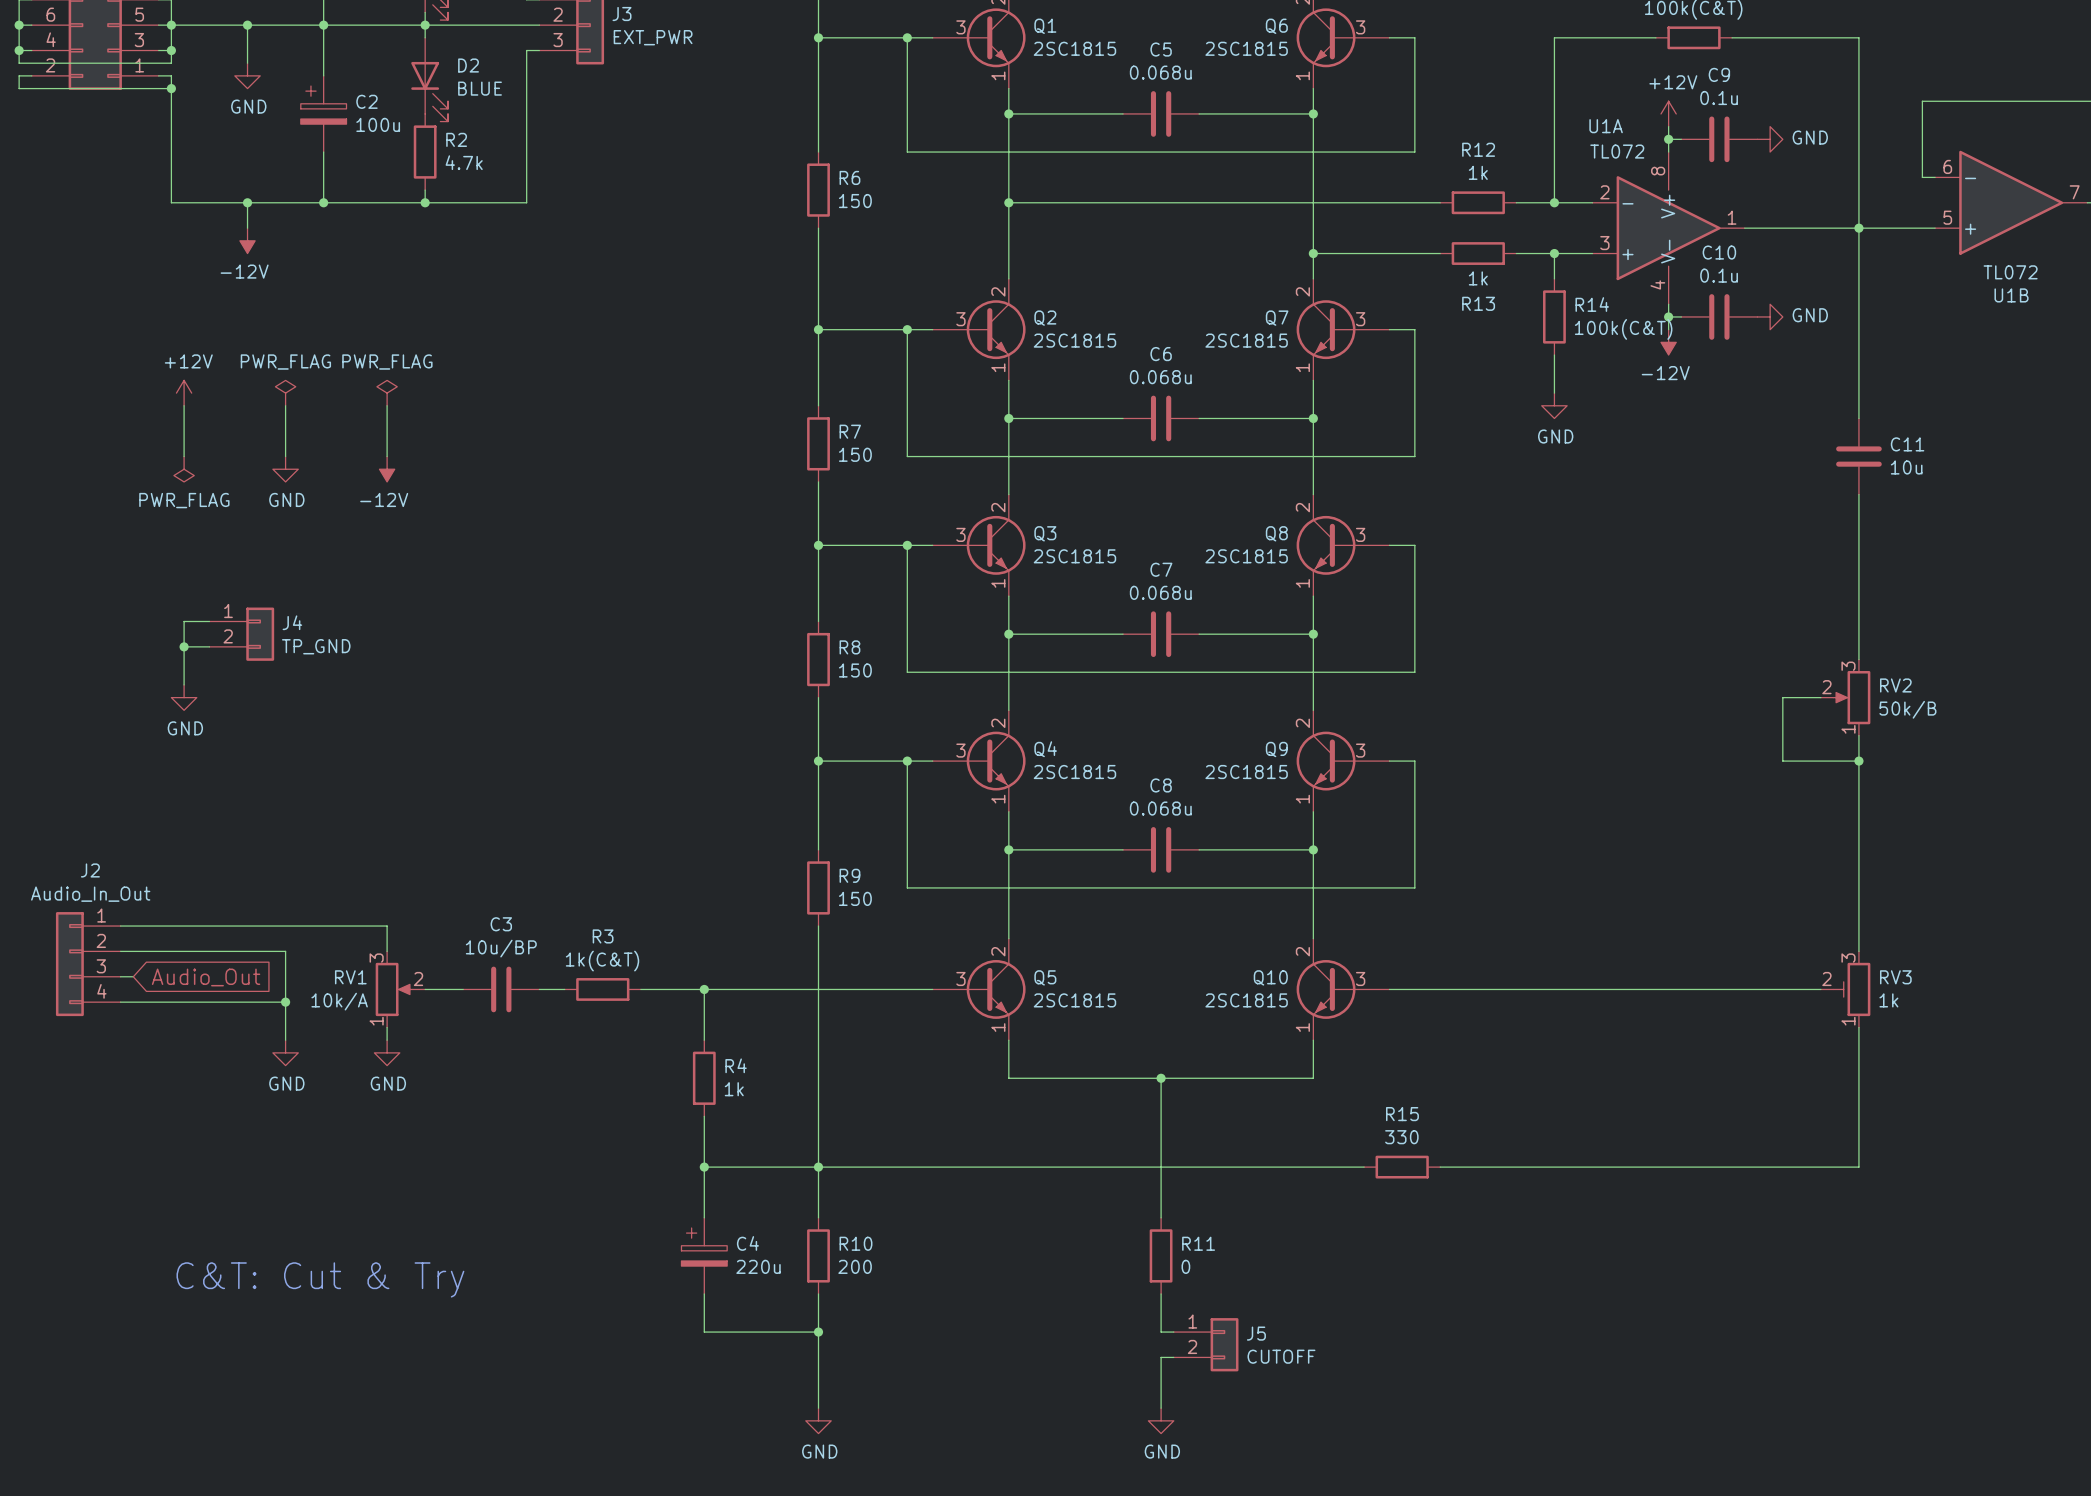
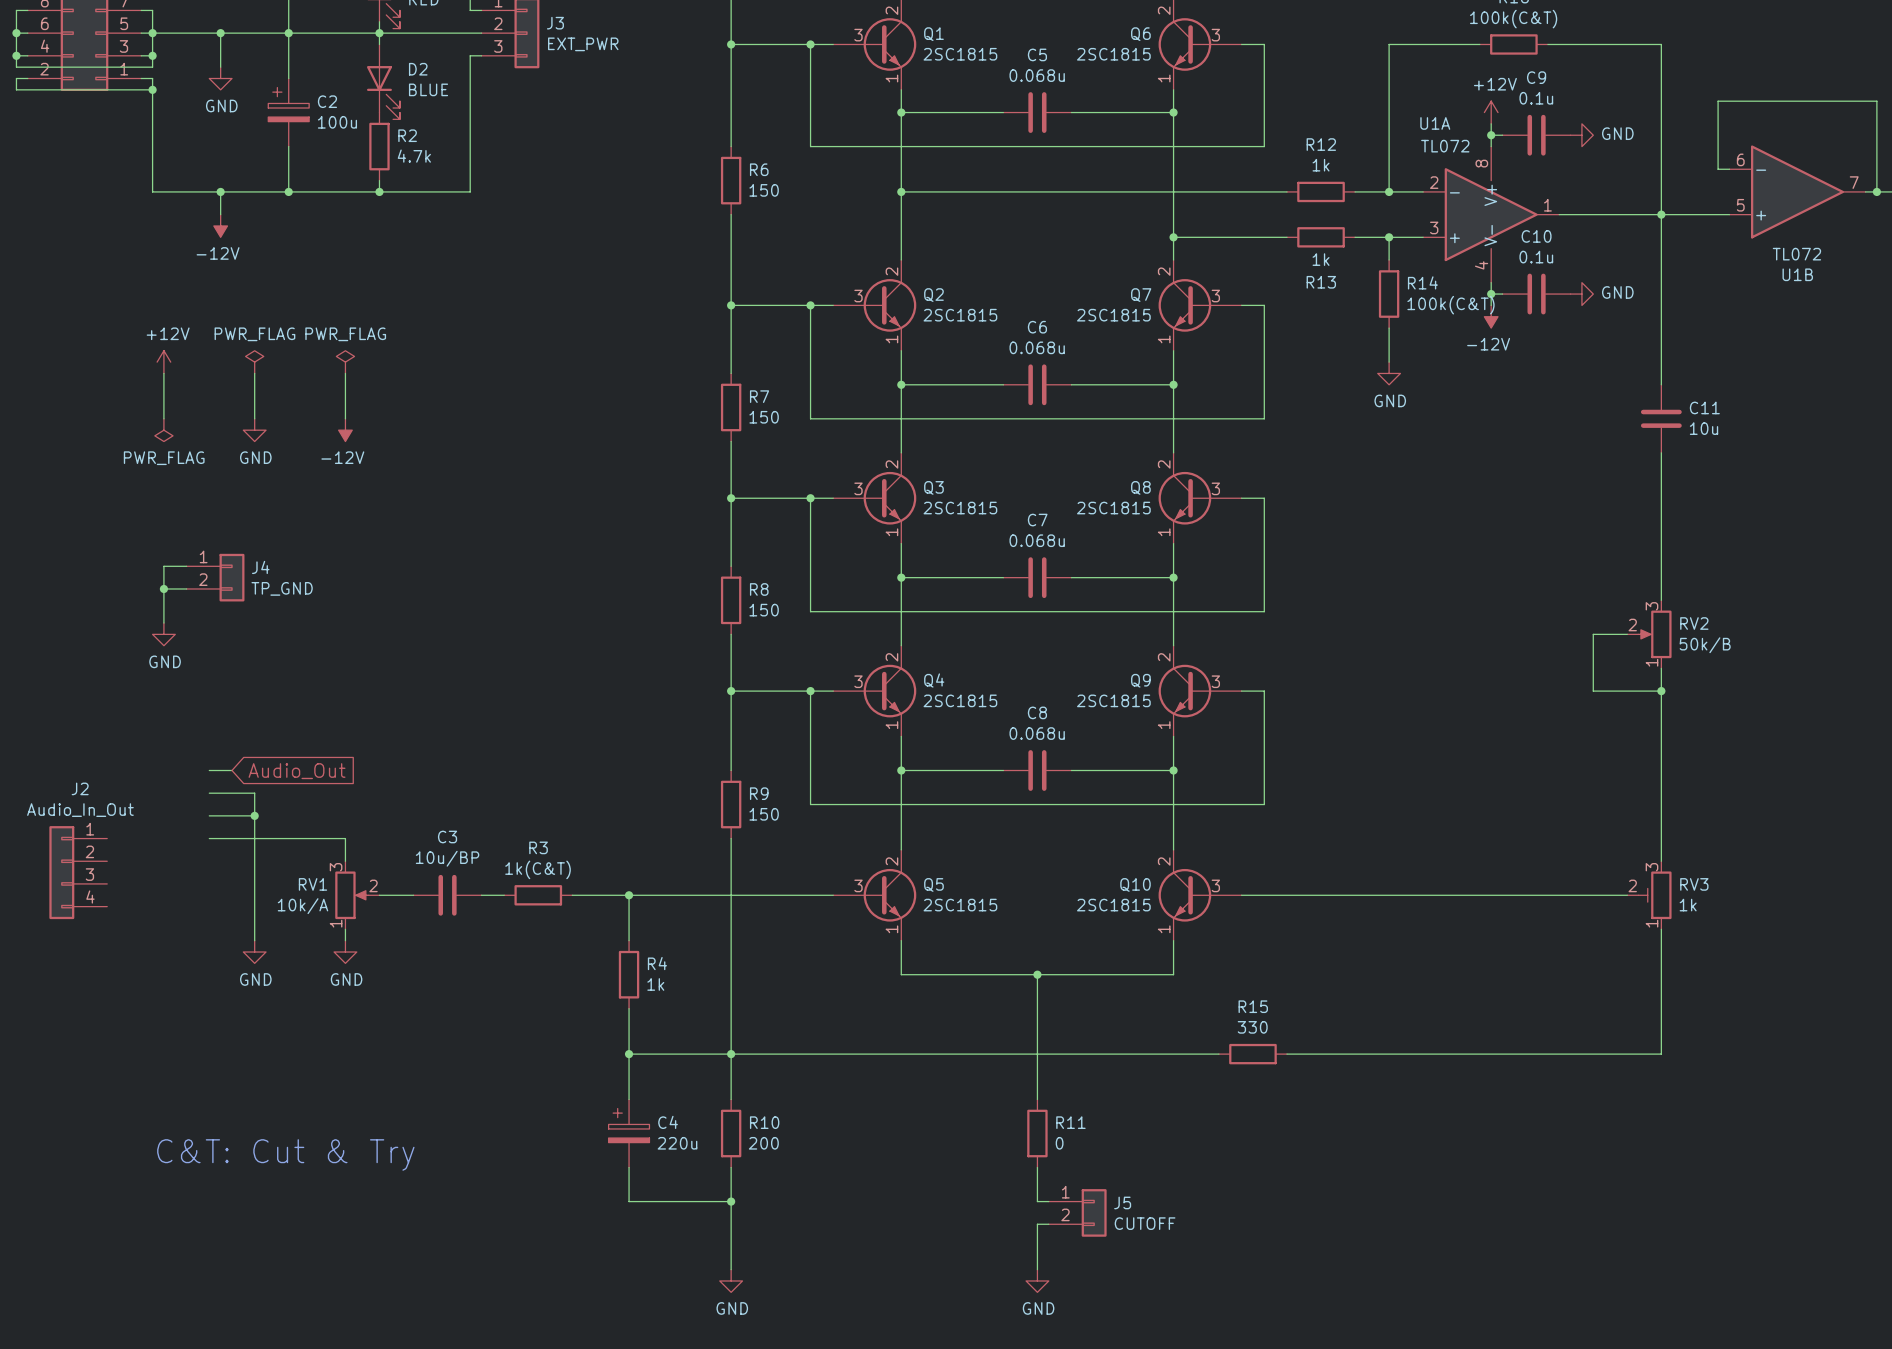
wire: none -> (209, 770) (231, 770)
wire: none -> (209, 815) (254, 815)
junction: none -> (254, 815)
wire: (120, 926) (234, 926) -> none
wire: (120, 951) (285, 951) -> (209, 793) (254, 793) (254, 861)
wire: (120, 976) (133, 976) -> none
global label position: Audio_Out (206, 977) -> Audio_Out (297, 771)
wire: (120, 1002) (285, 1002) -> none
junction: (285, 1002) -> none

